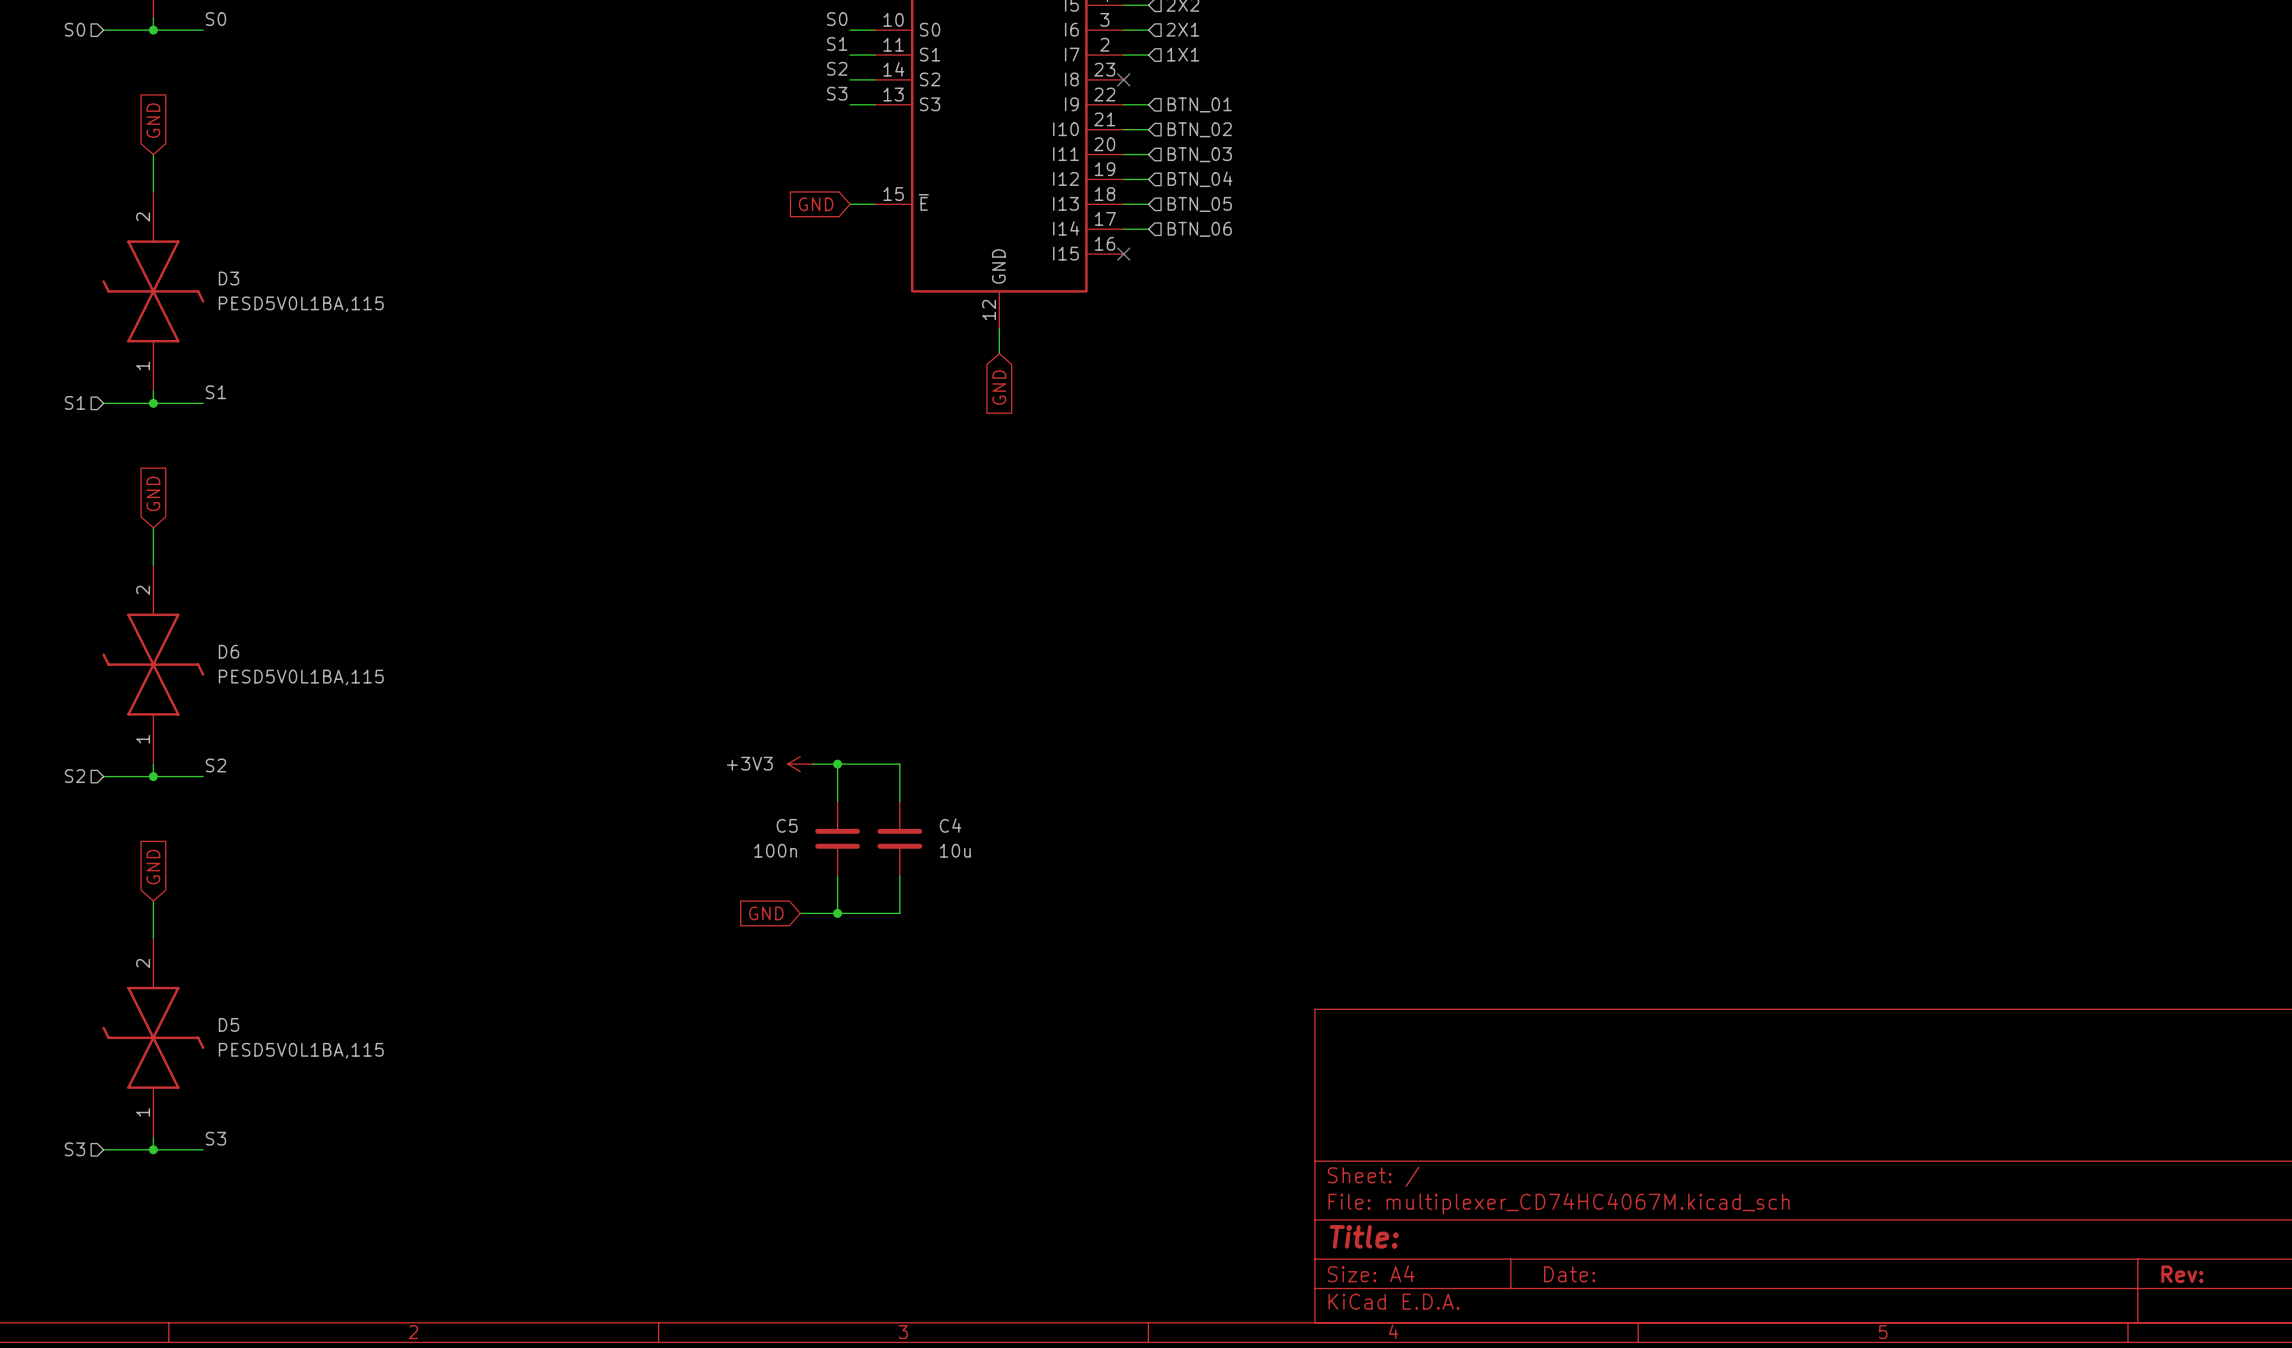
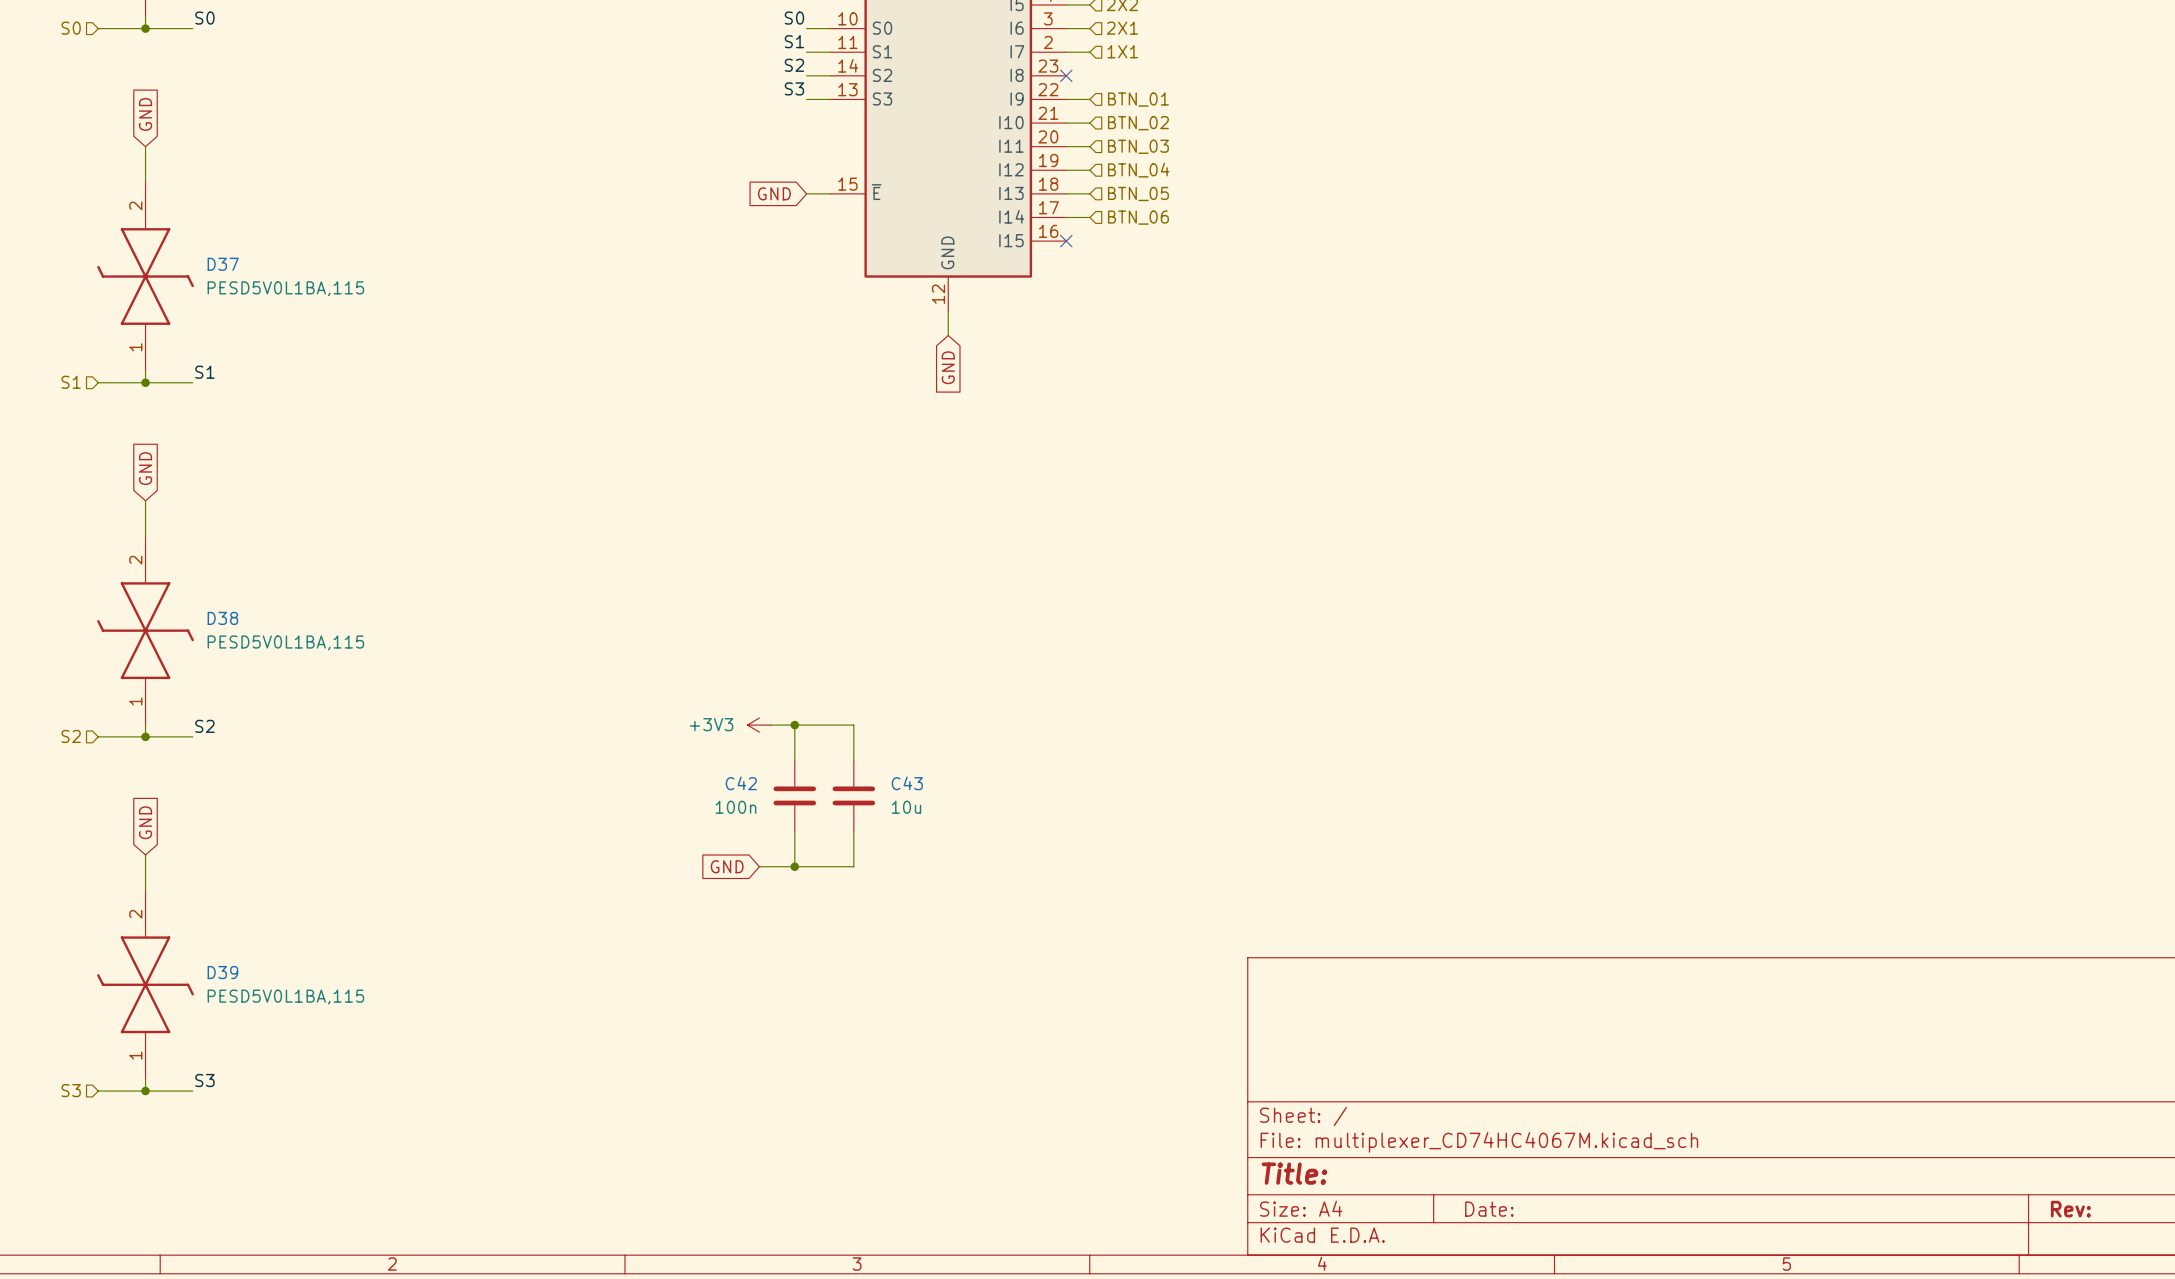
D3 name: D3 (229, 278) -> D37 (223, 264)
D6 name: D6 (229, 651) -> D38 (222, 618)
C5 name: C5 (787, 825) -> C42 (741, 783)
C4 name: C4 (950, 825) -> C43 (907, 783)
D5 name: D5 (229, 1024) -> D39 (222, 972)

